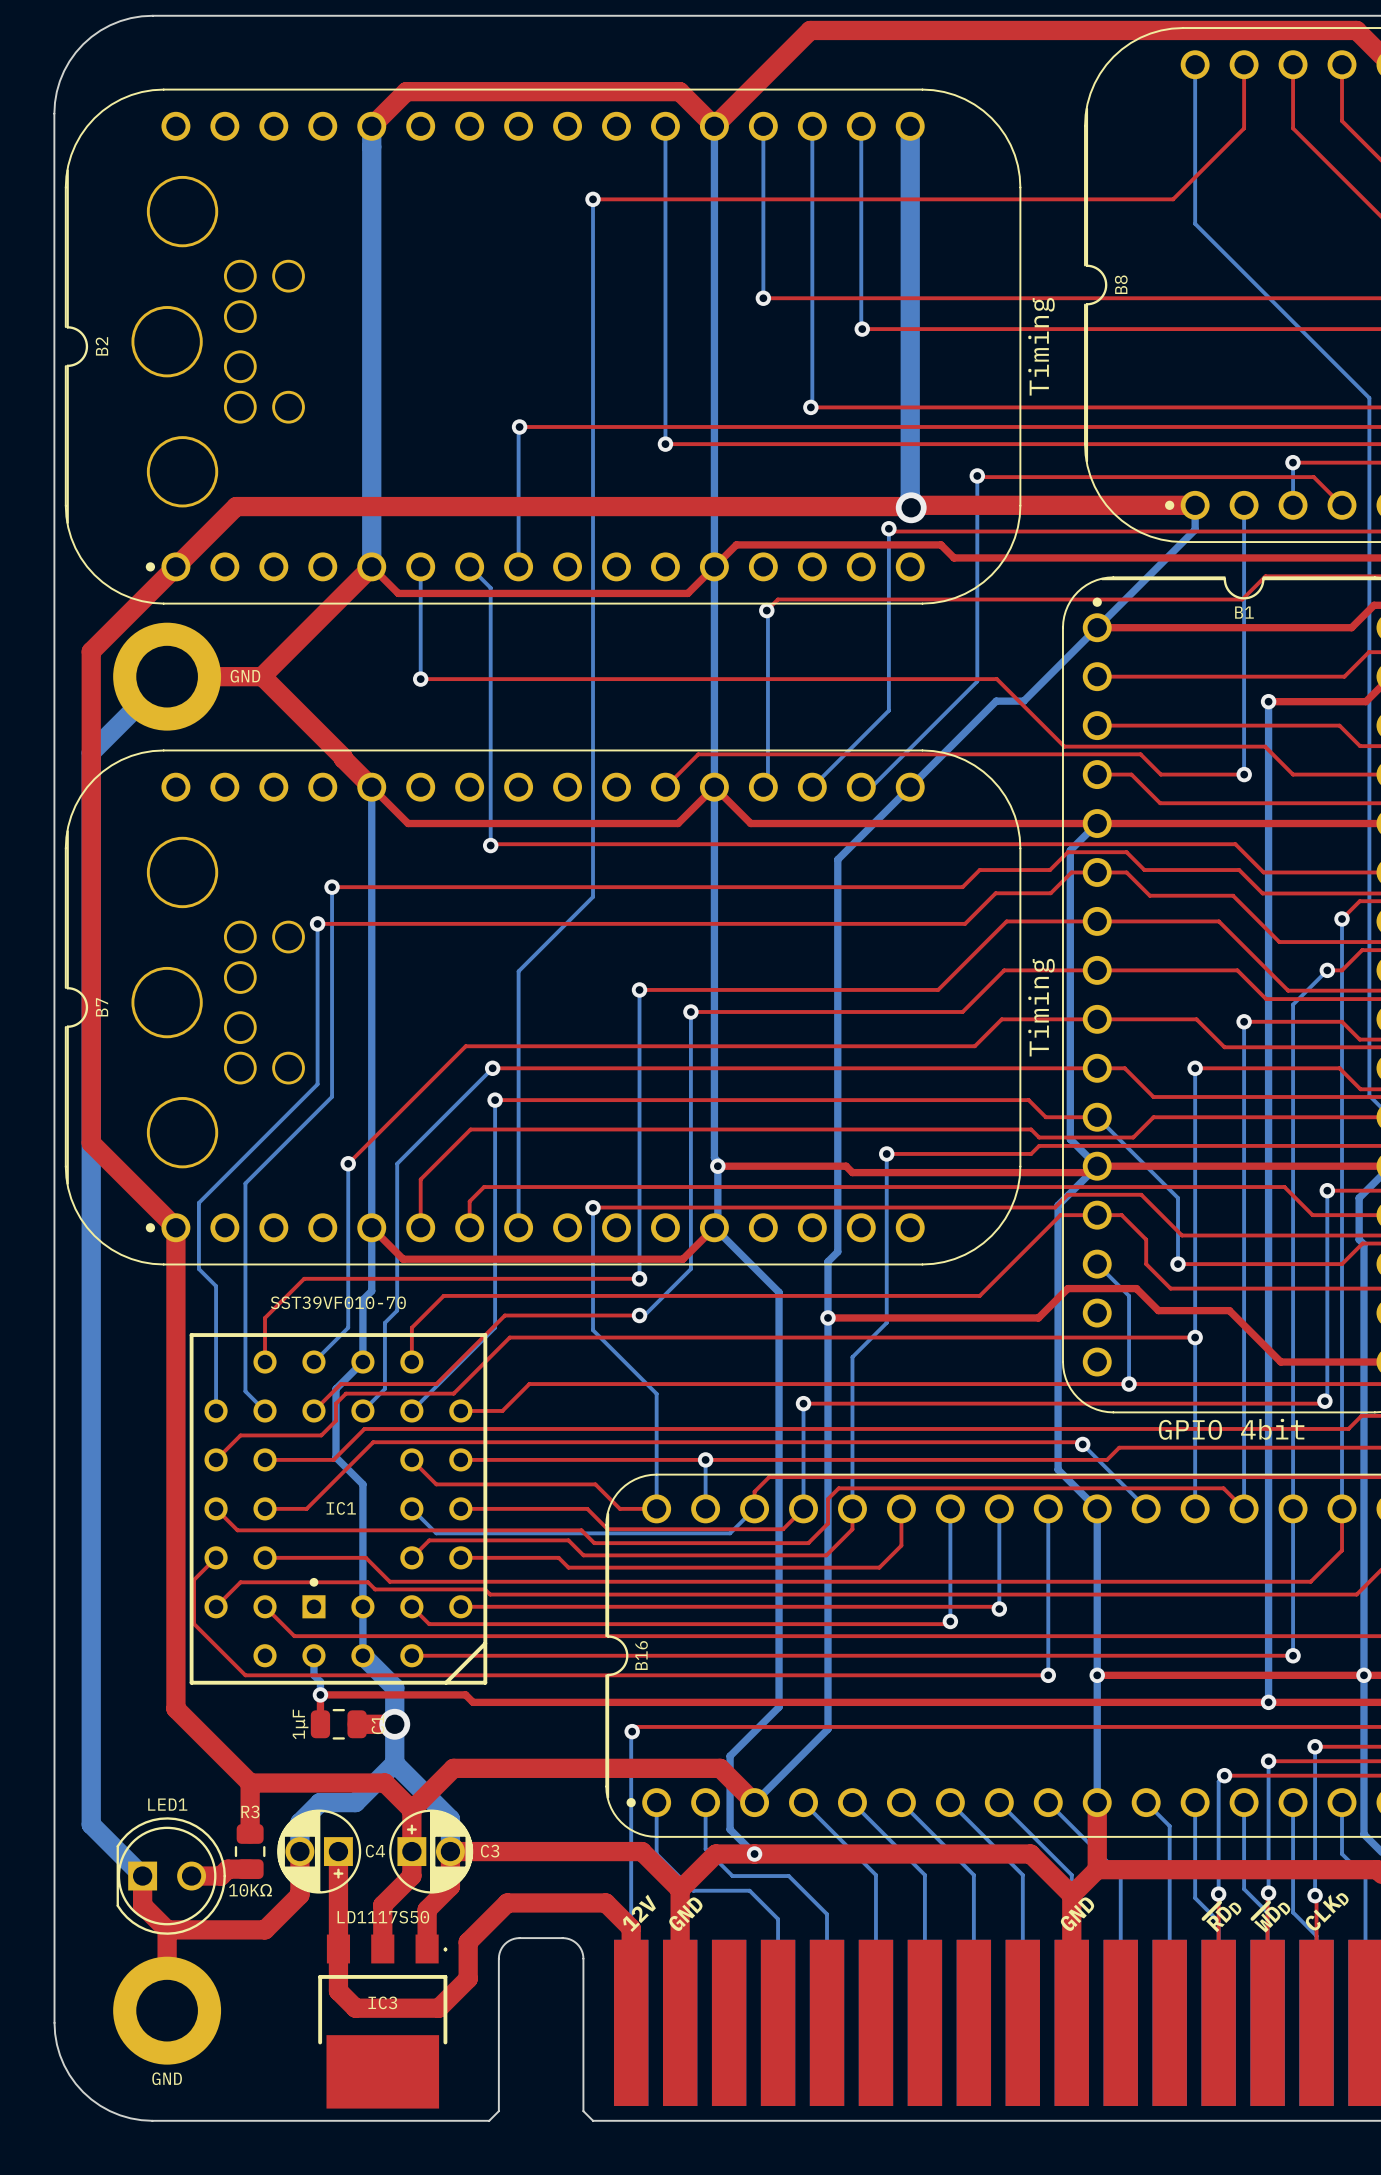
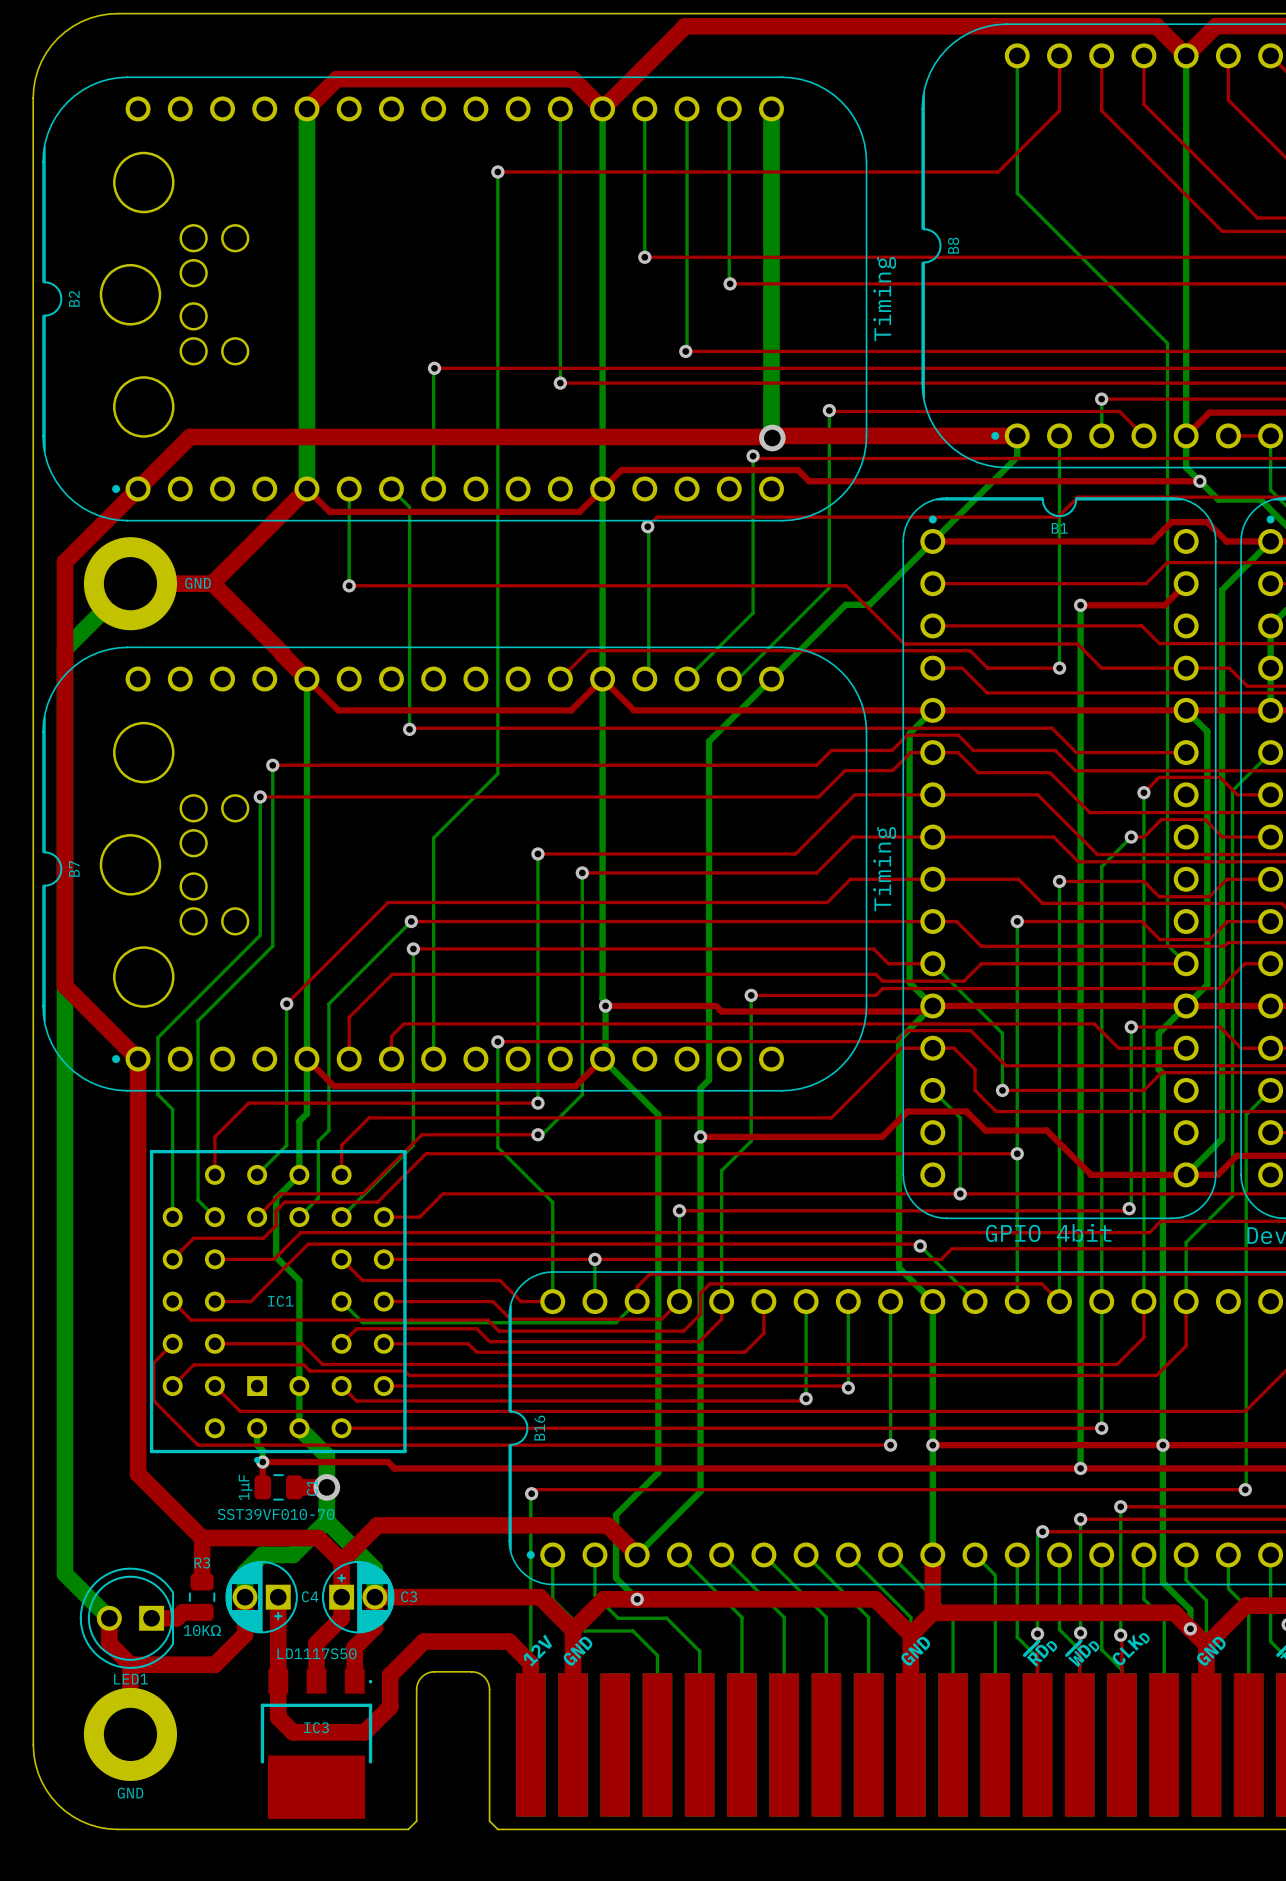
IC1 footprint: [189, 1333, 488, 1685] -> [149, 1149, 407, 1464]
LED1 rotation: 0° (171, 1876) -> 180° (126, 1618)

